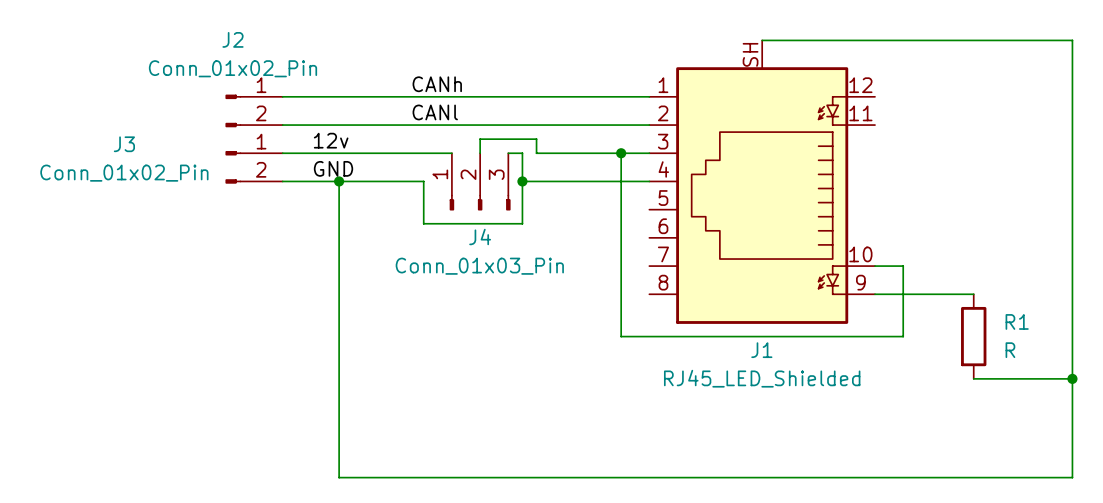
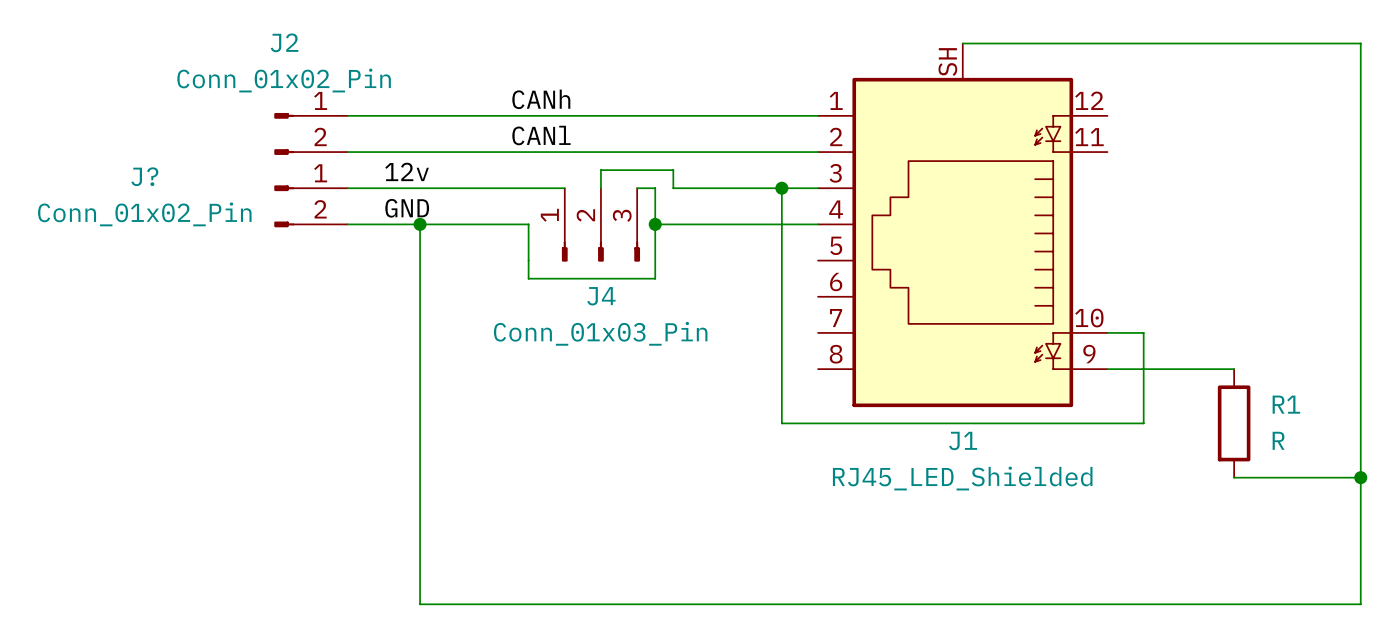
J3 name: J3 (124, 144) -> J? (144, 176)

